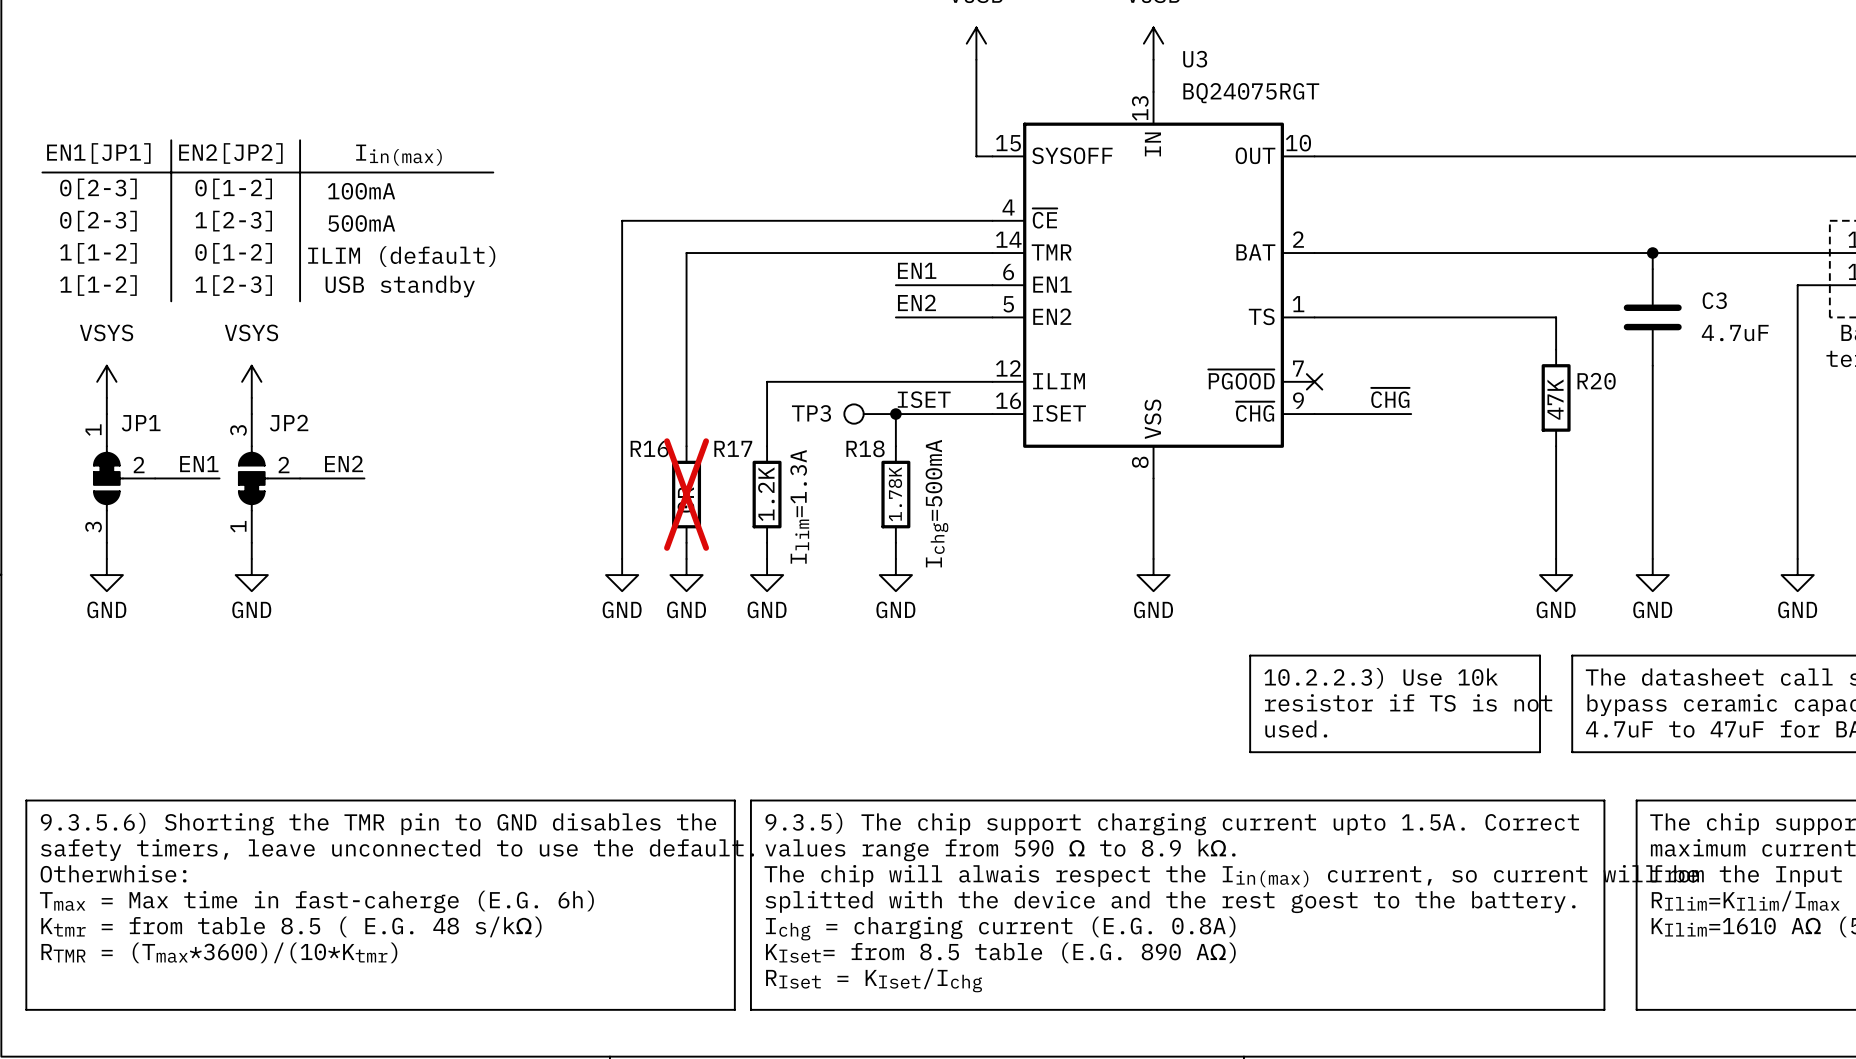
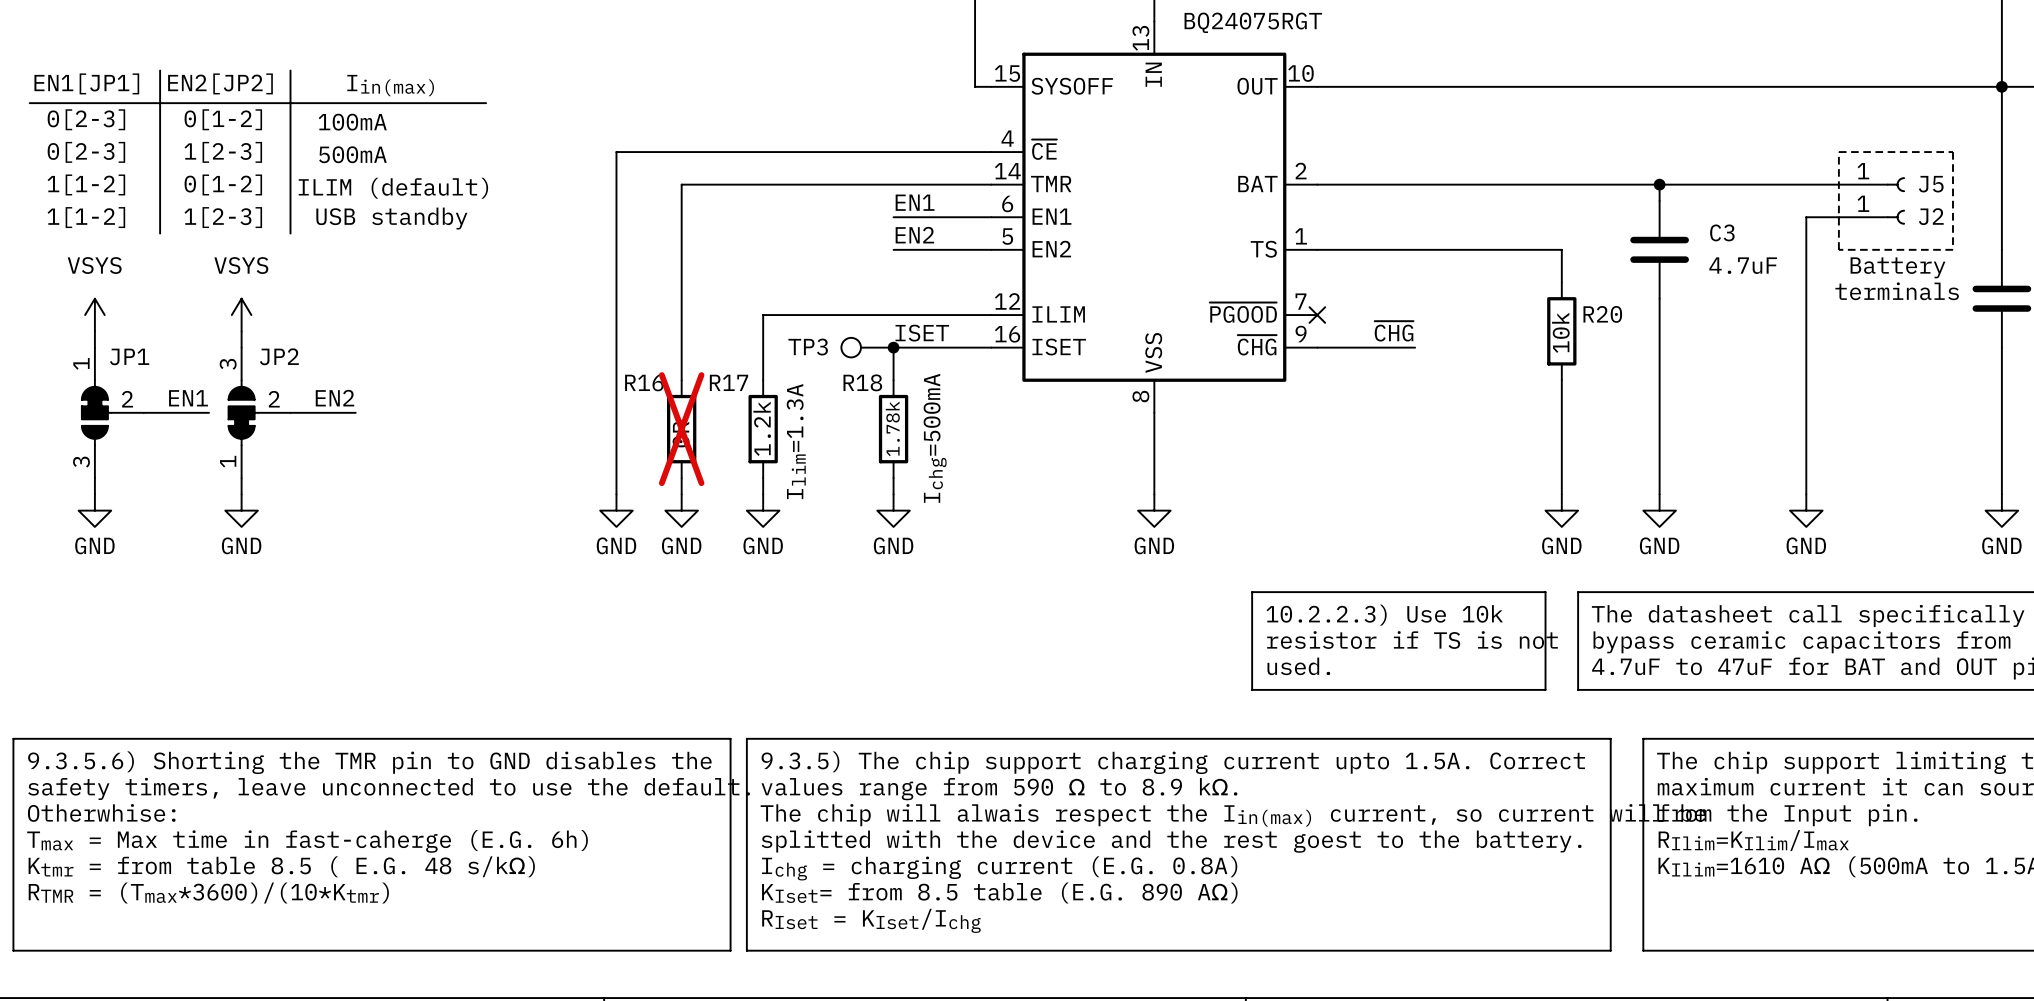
R20 value: 47K (1555, 399) -> 10k (1560, 332)
R17 value: 1.2K (766, 494) -> 1.2k (762, 428)
R18 value: 1.78K (895, 494) -> 1.78k (892, 428)

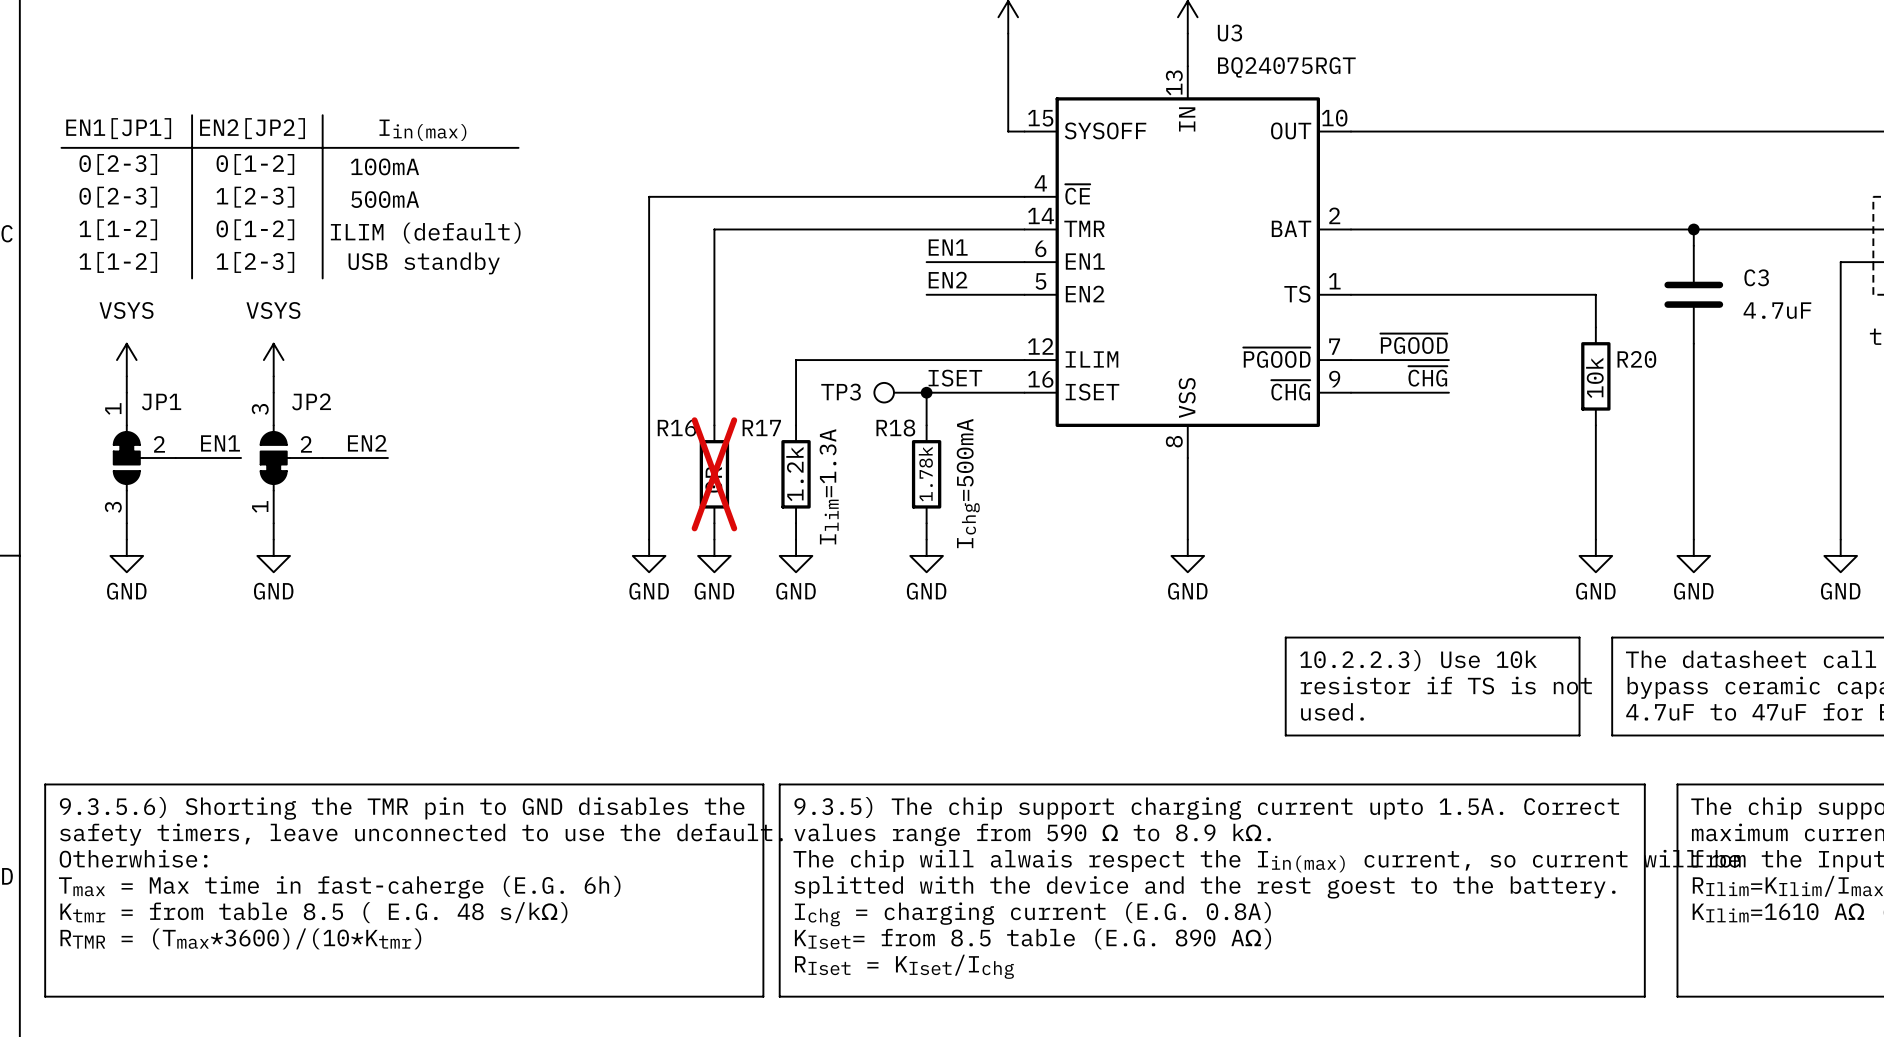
label: none -> ~{PGOOD} (1414, 343)
wire: none -> (1351, 360) (1448, 360)
no-connect mark: (1317, 315) -> none

